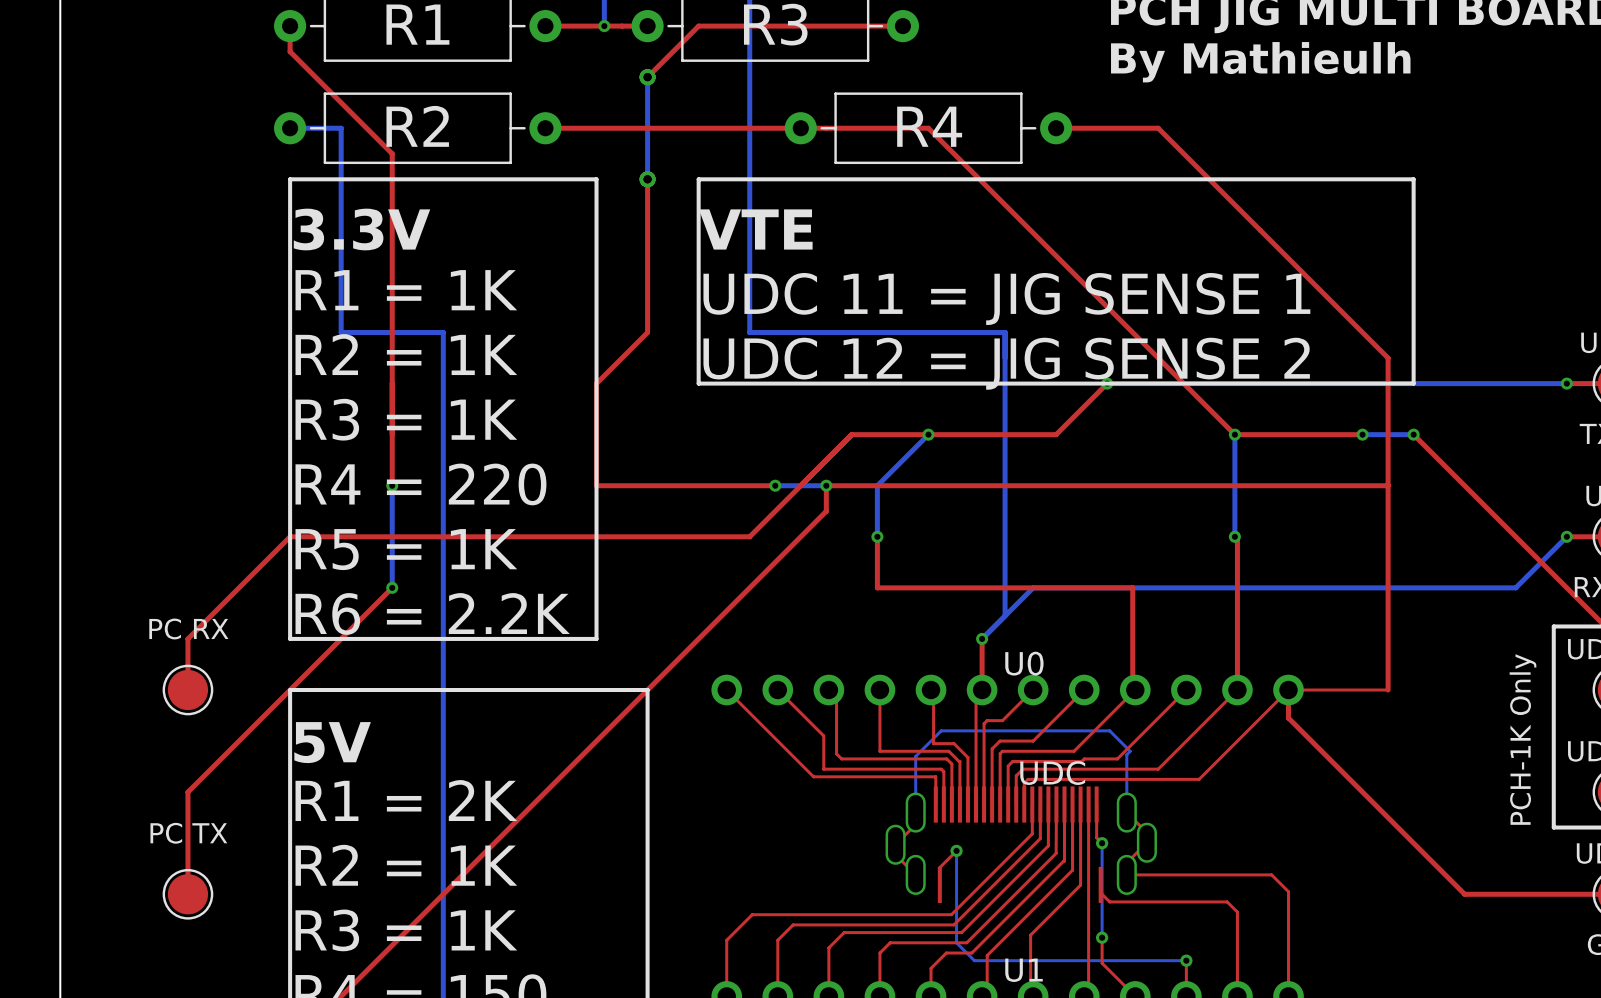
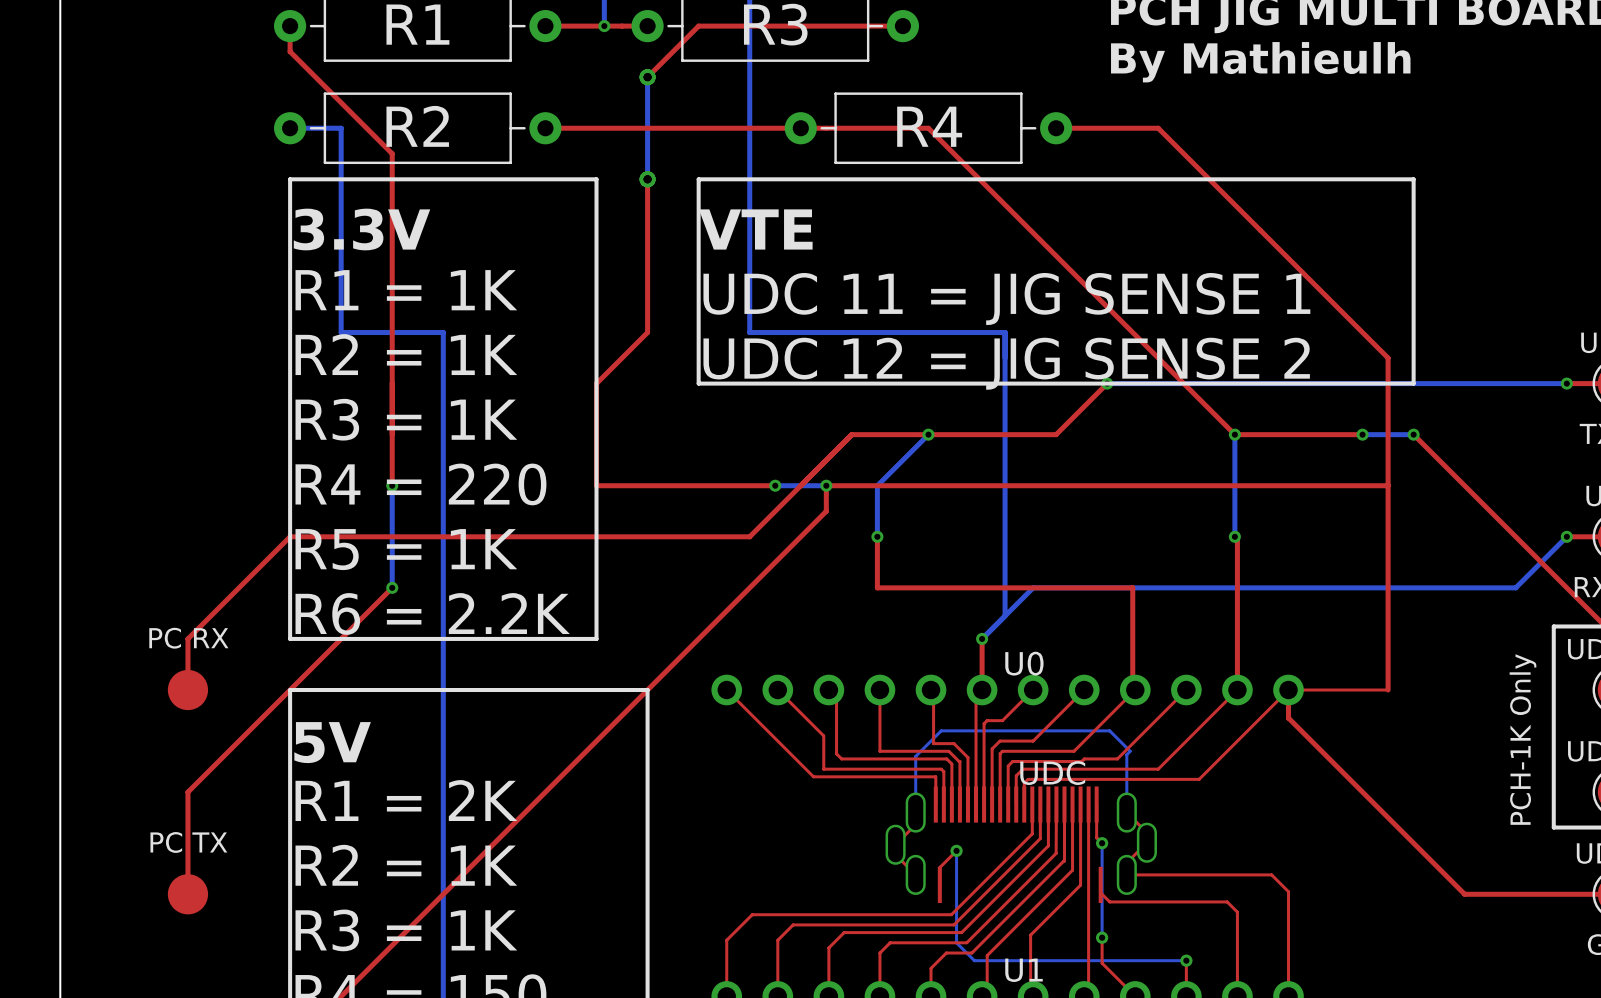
text: none -> PC RX (188, 638)
PC RX: (187, 690) -> none
part: none -> (187, 690)
text: none -> PC TX (188, 842)
PC TX: (187, 894) -> none
part: none -> (187, 894)

